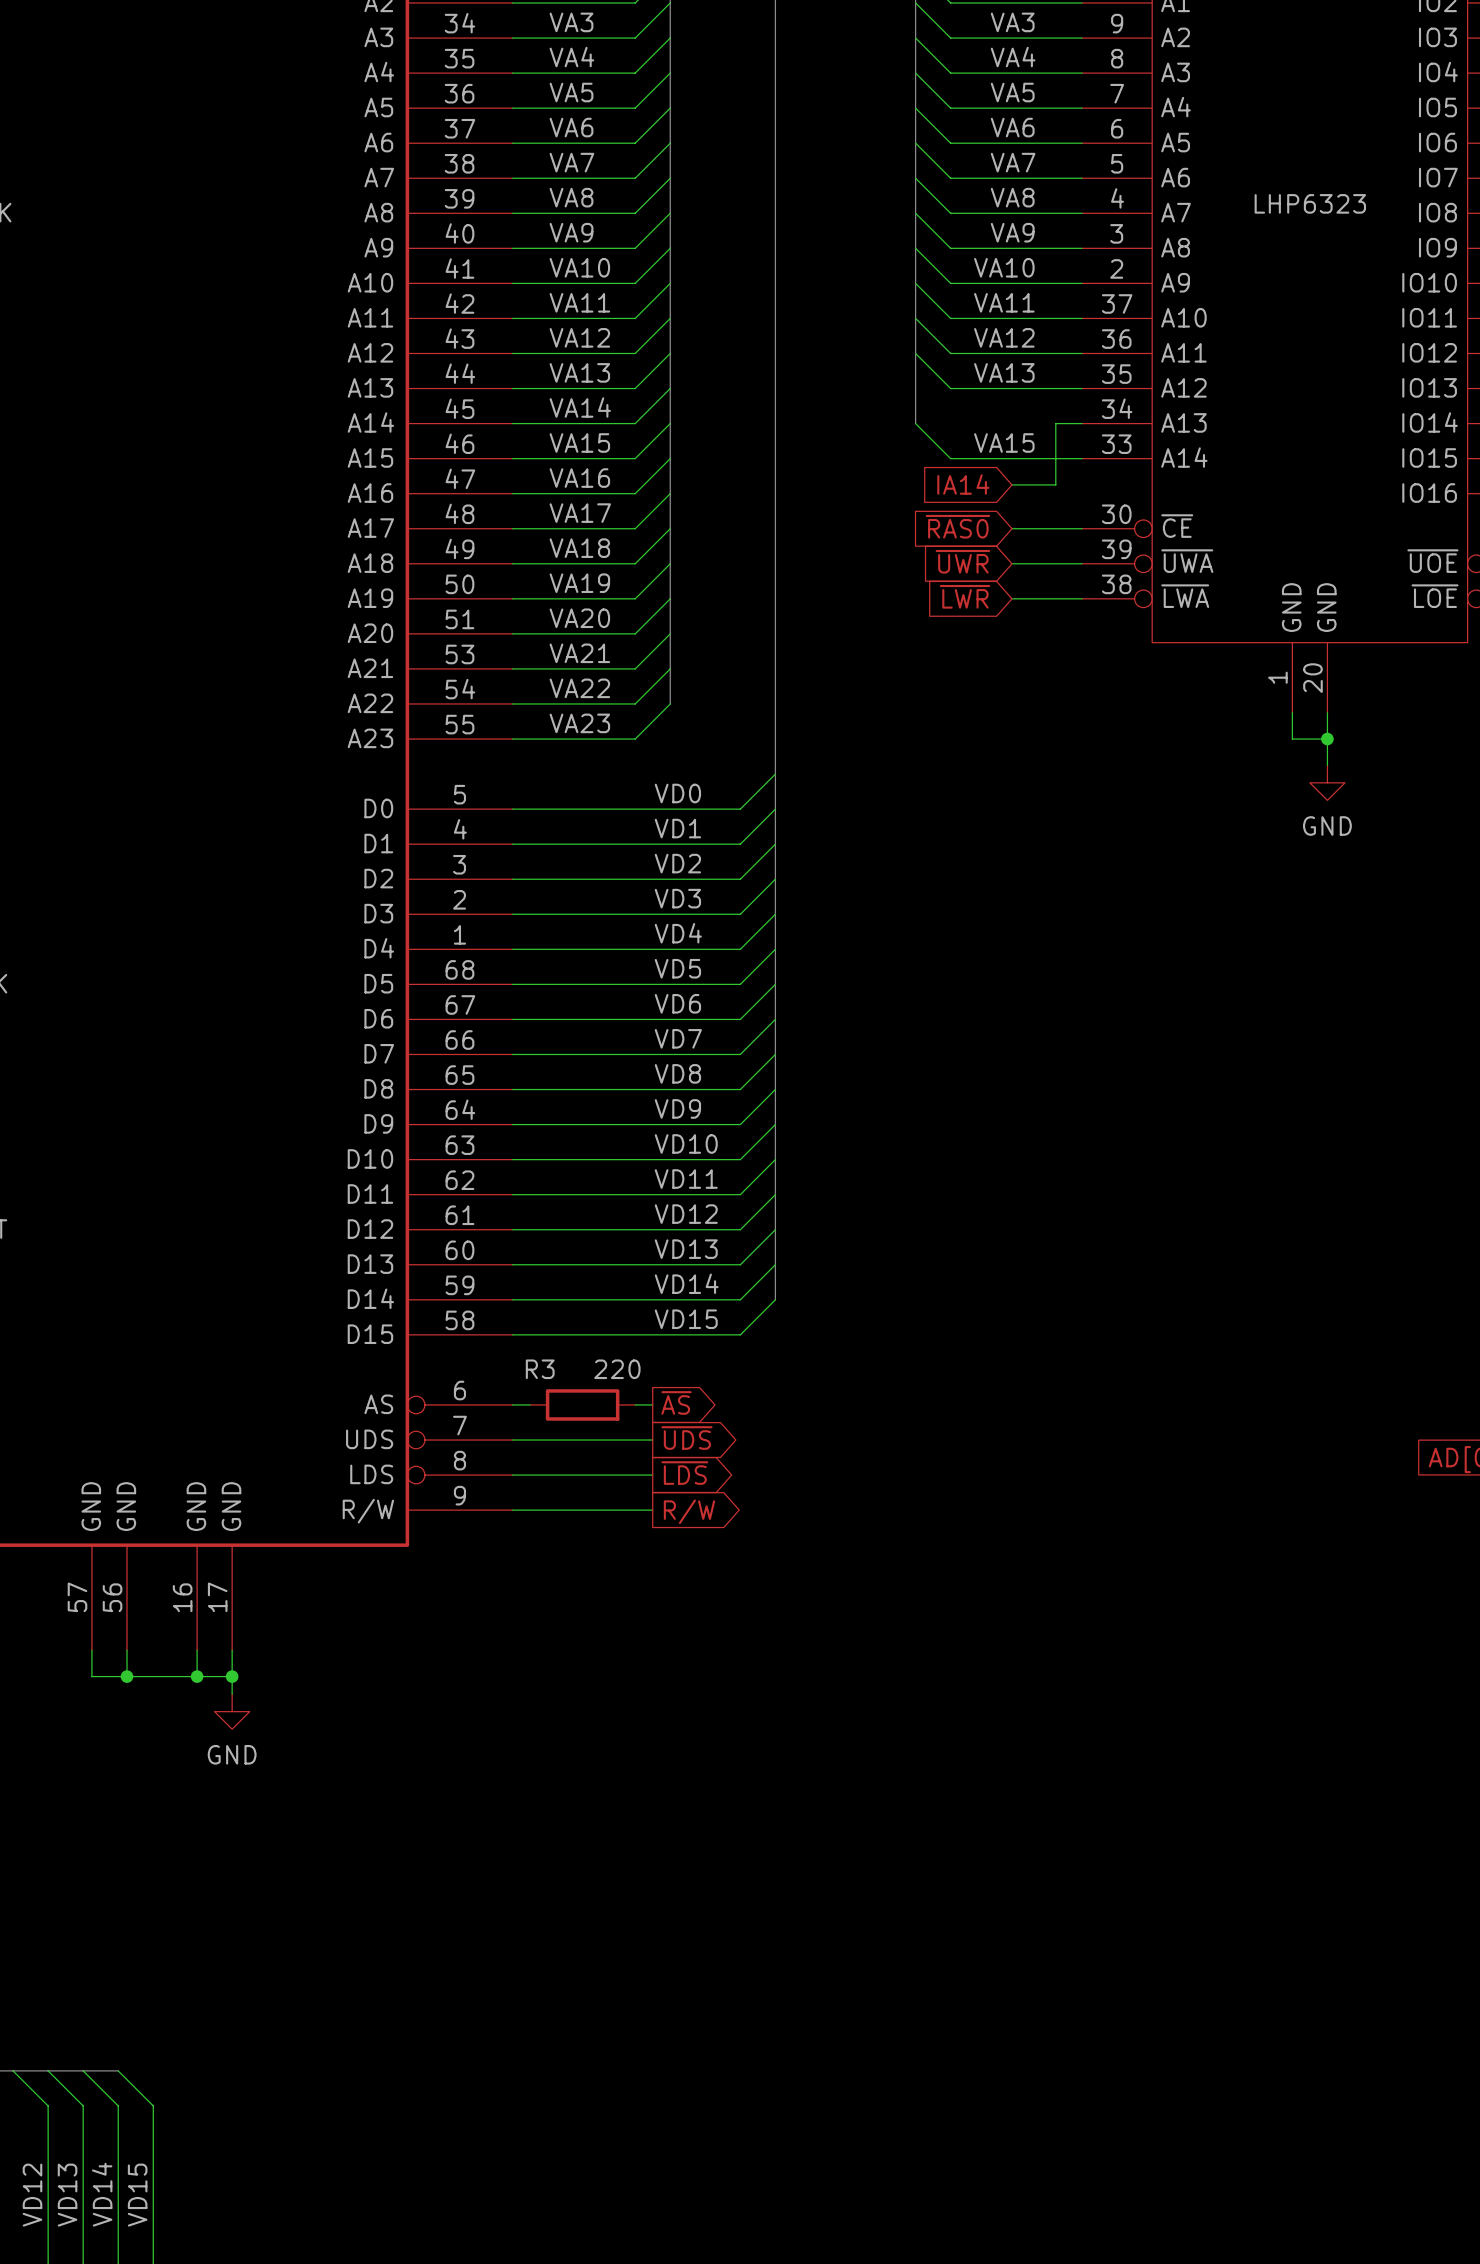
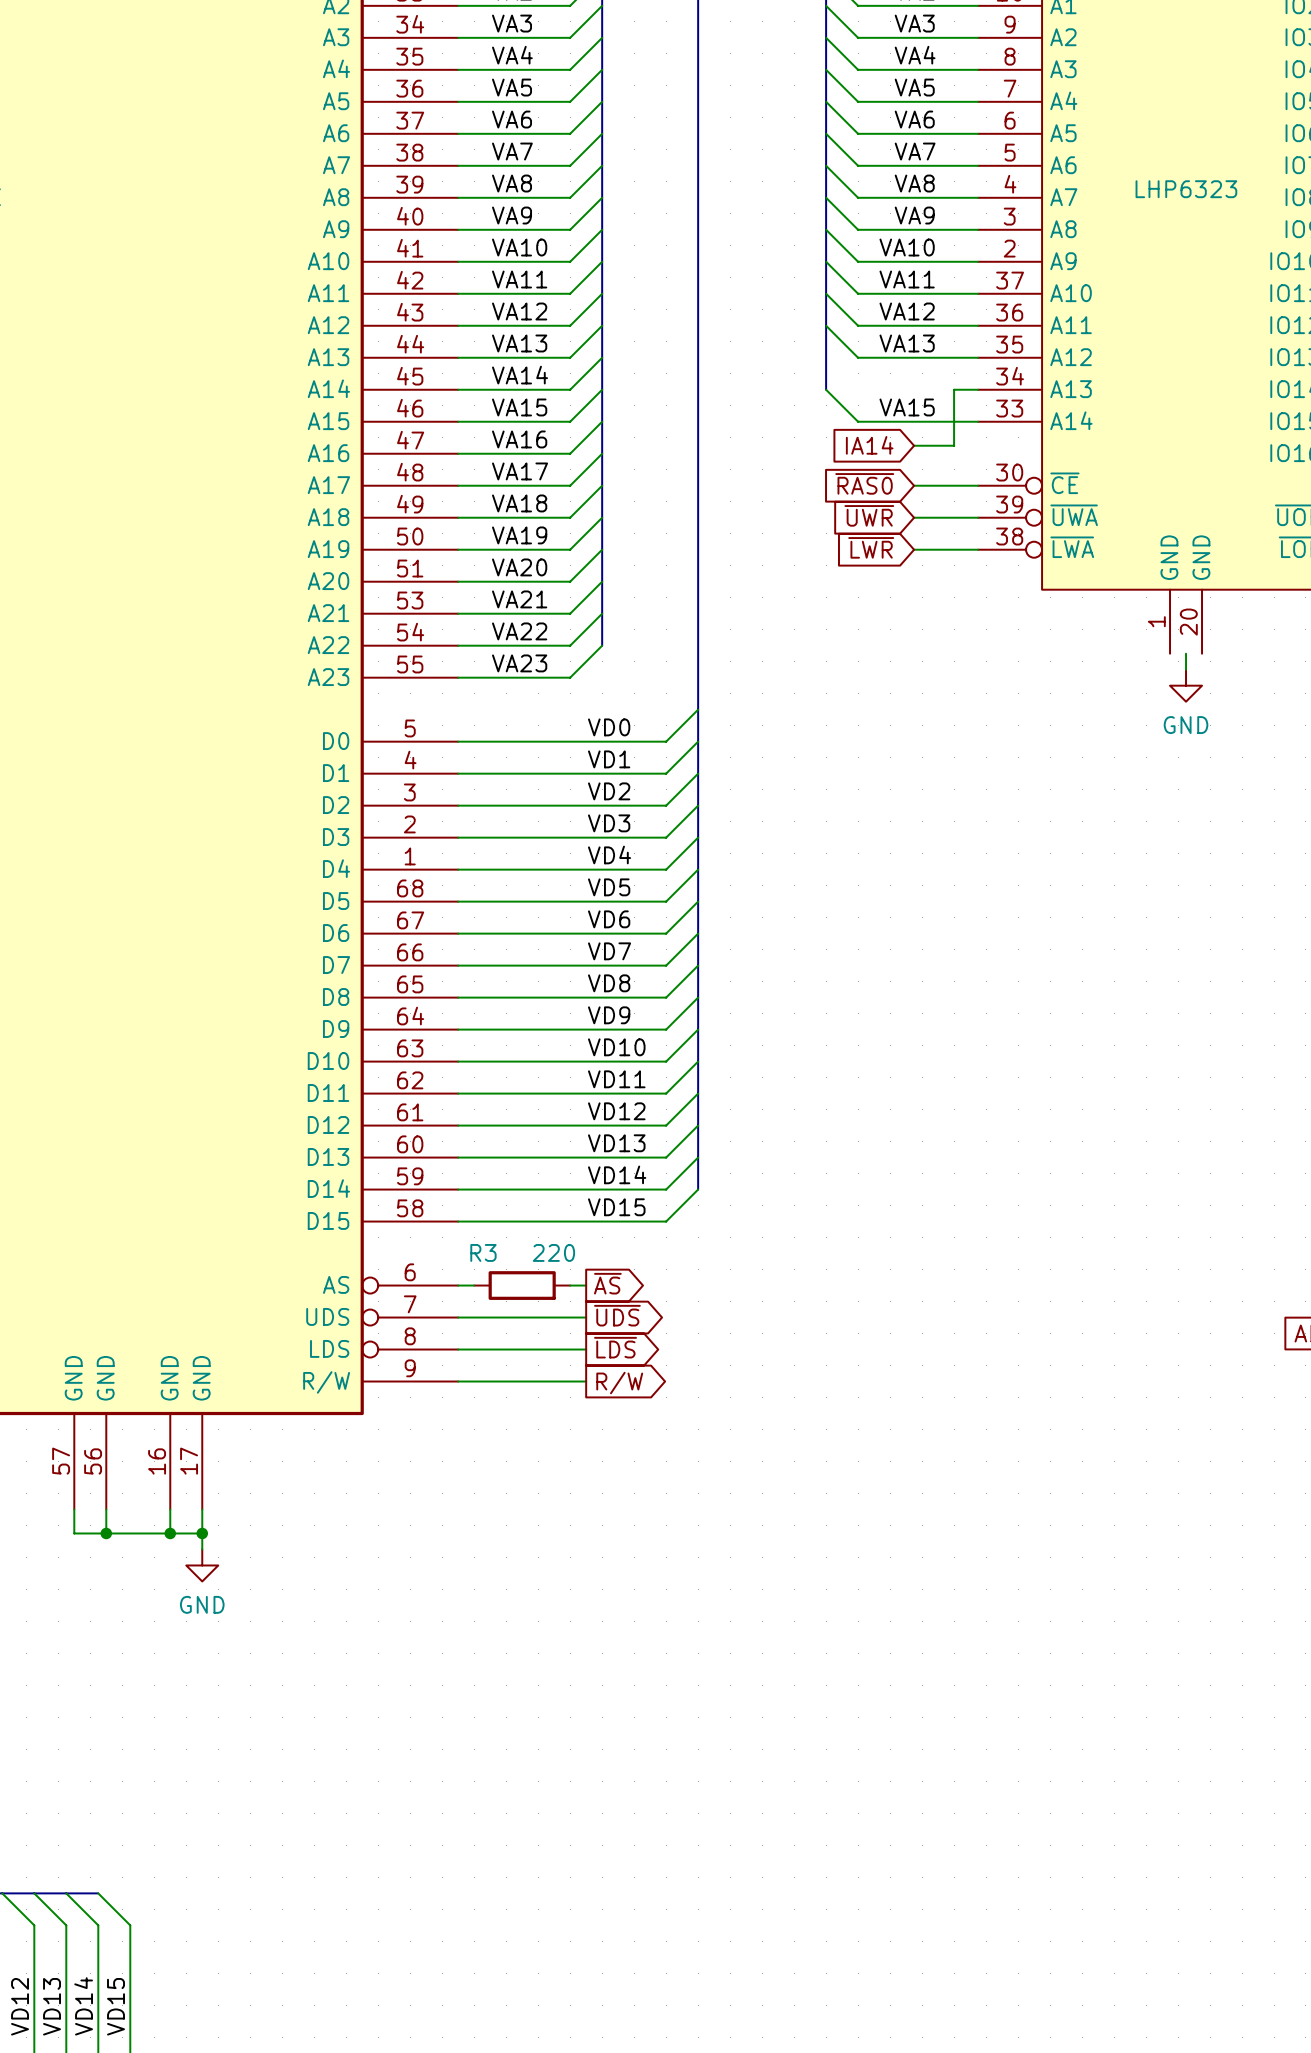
wire: (1292, 712) (1292, 739) (1327, 739) -> none
wire: none -> (1186, 653) (1186, 669)
wire: (1327, 712) (1327, 765) -> none
junction: (1327, 739) -> none
power symbol position: GND (1327, 782) -> GND (1186, 685)

